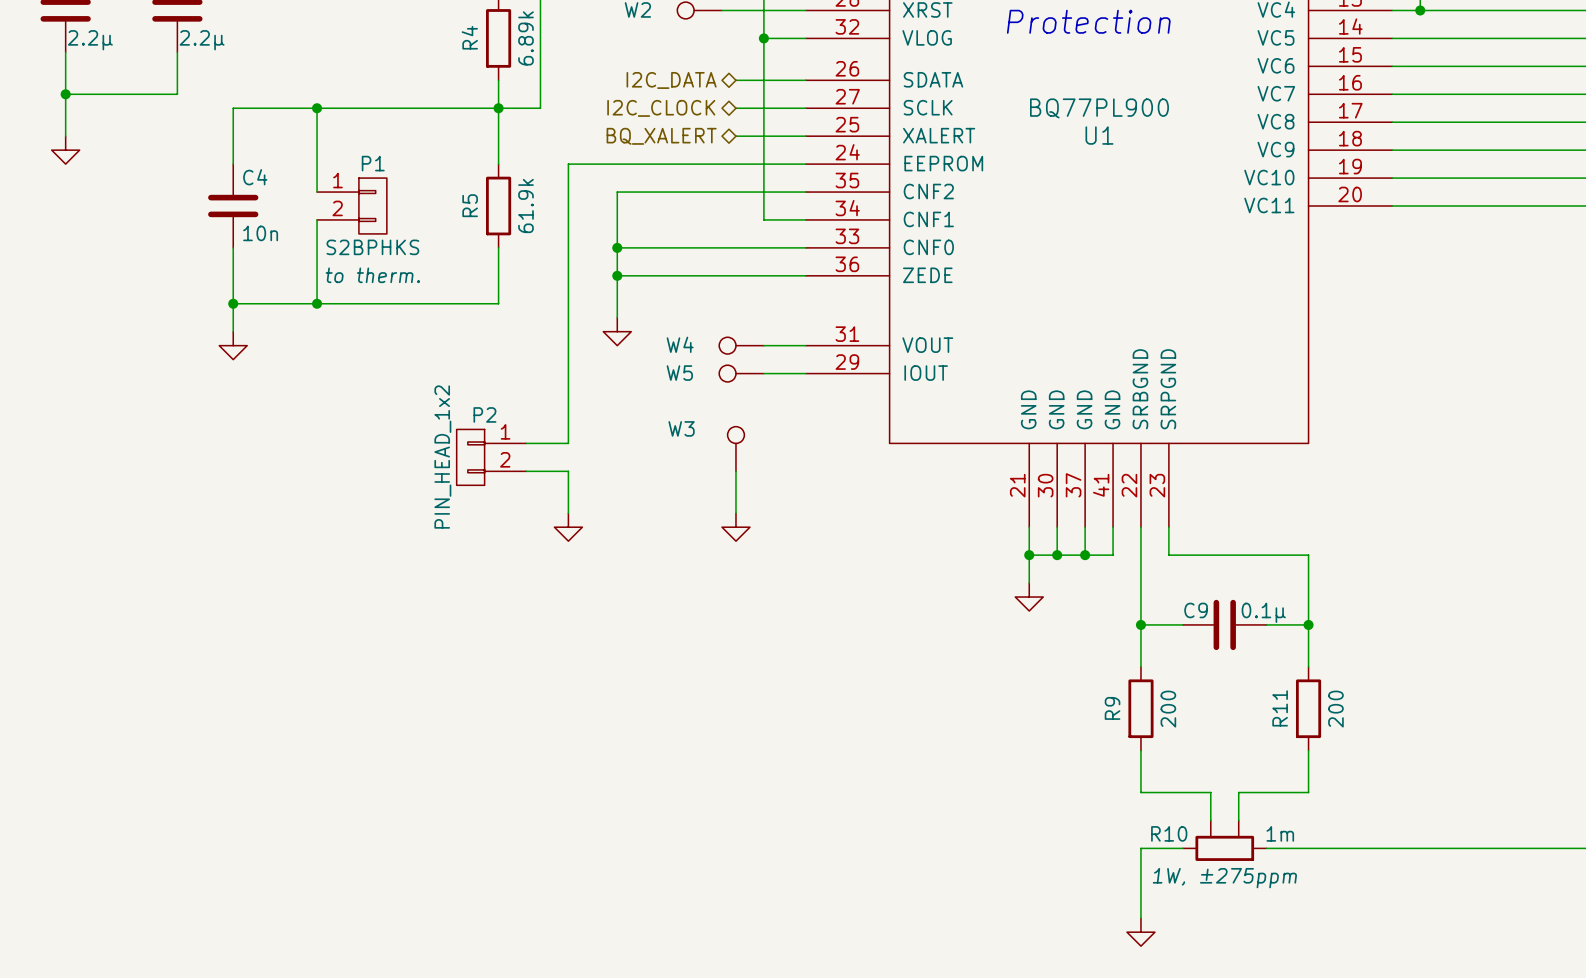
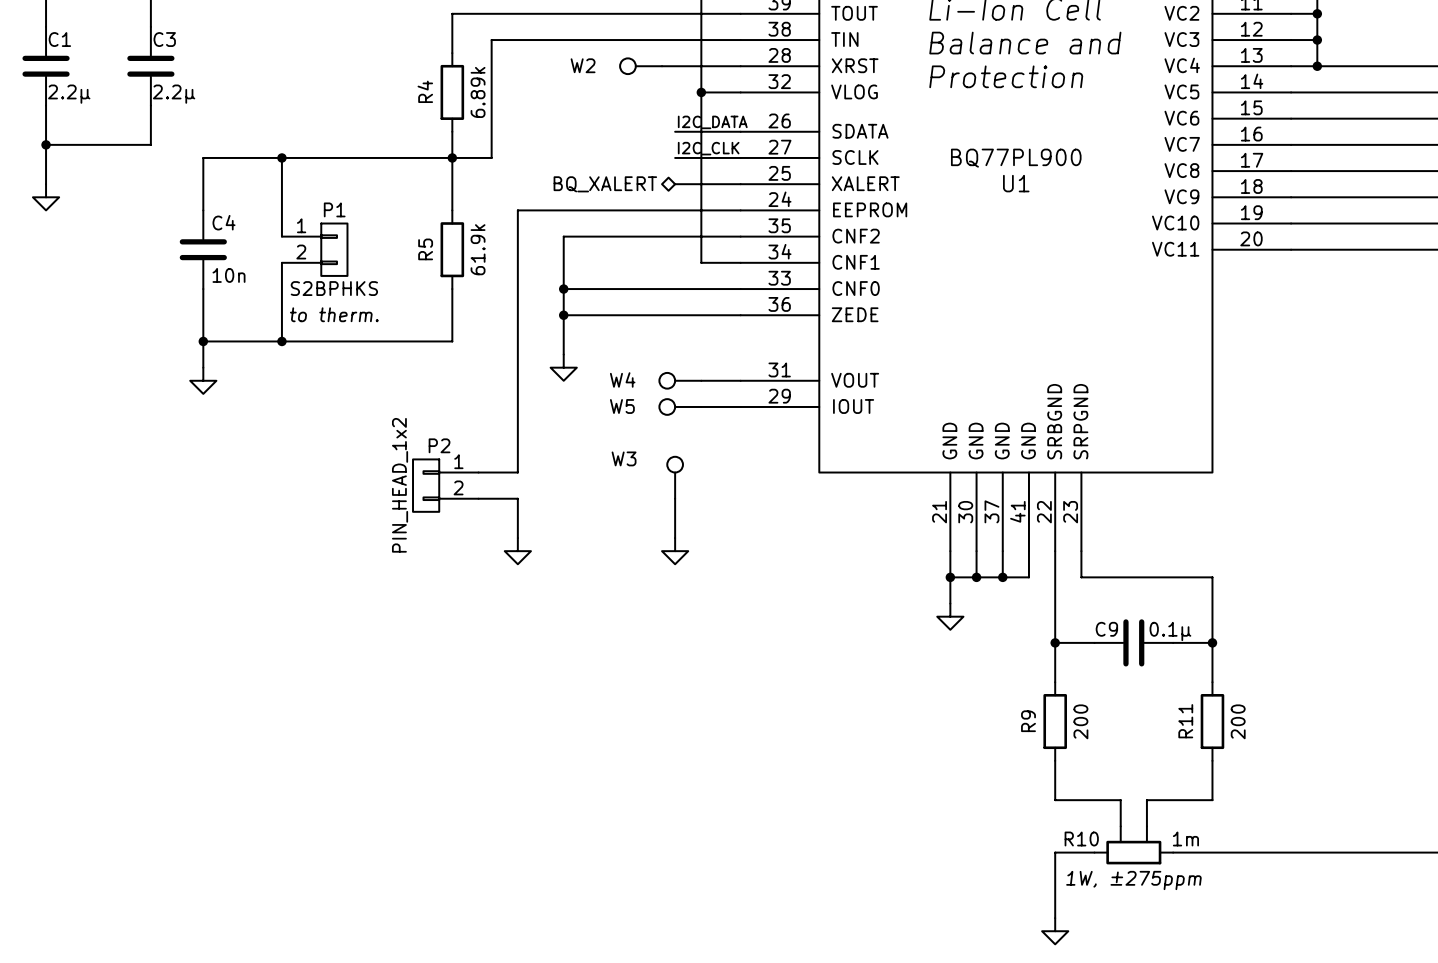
label: none -> I2C_DATA (712, 122)
hierarchical label: I2C_DATA (671, 80) -> none
label: none -> I2C_CLK (708, 148)
hierarchical label: I2C_CLOCK (661, 108) -> none

